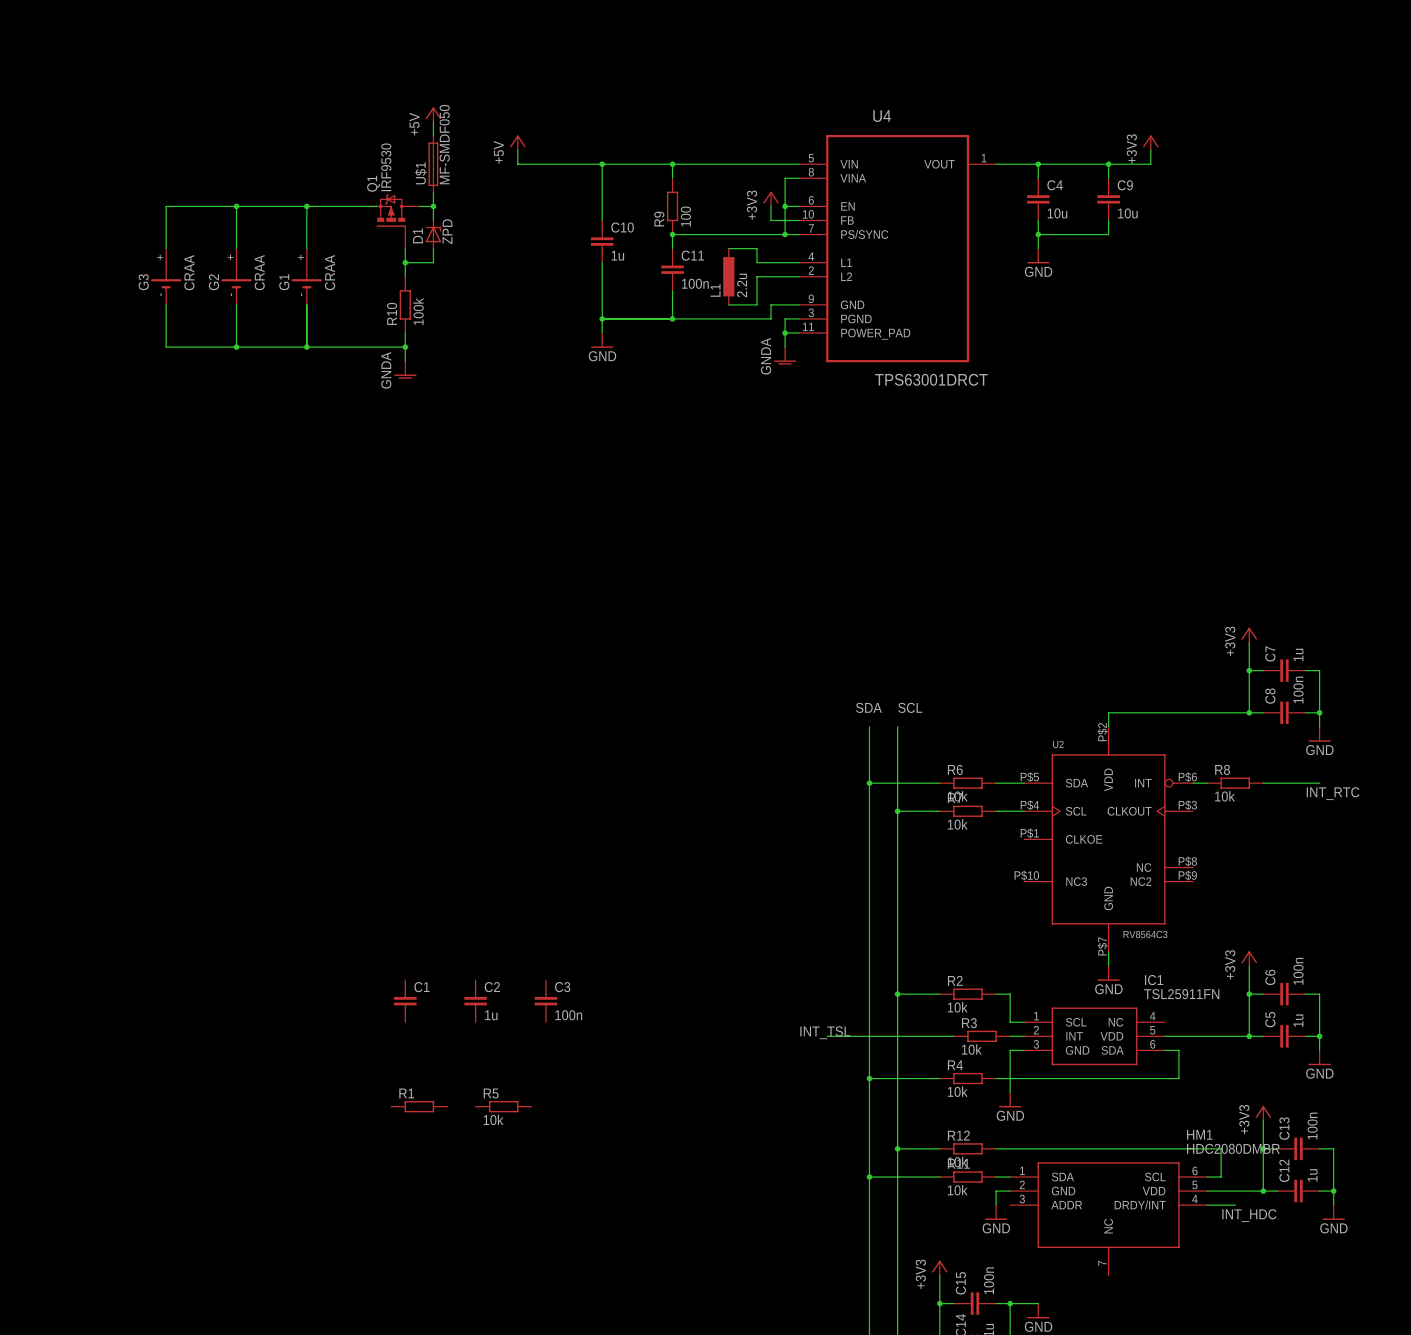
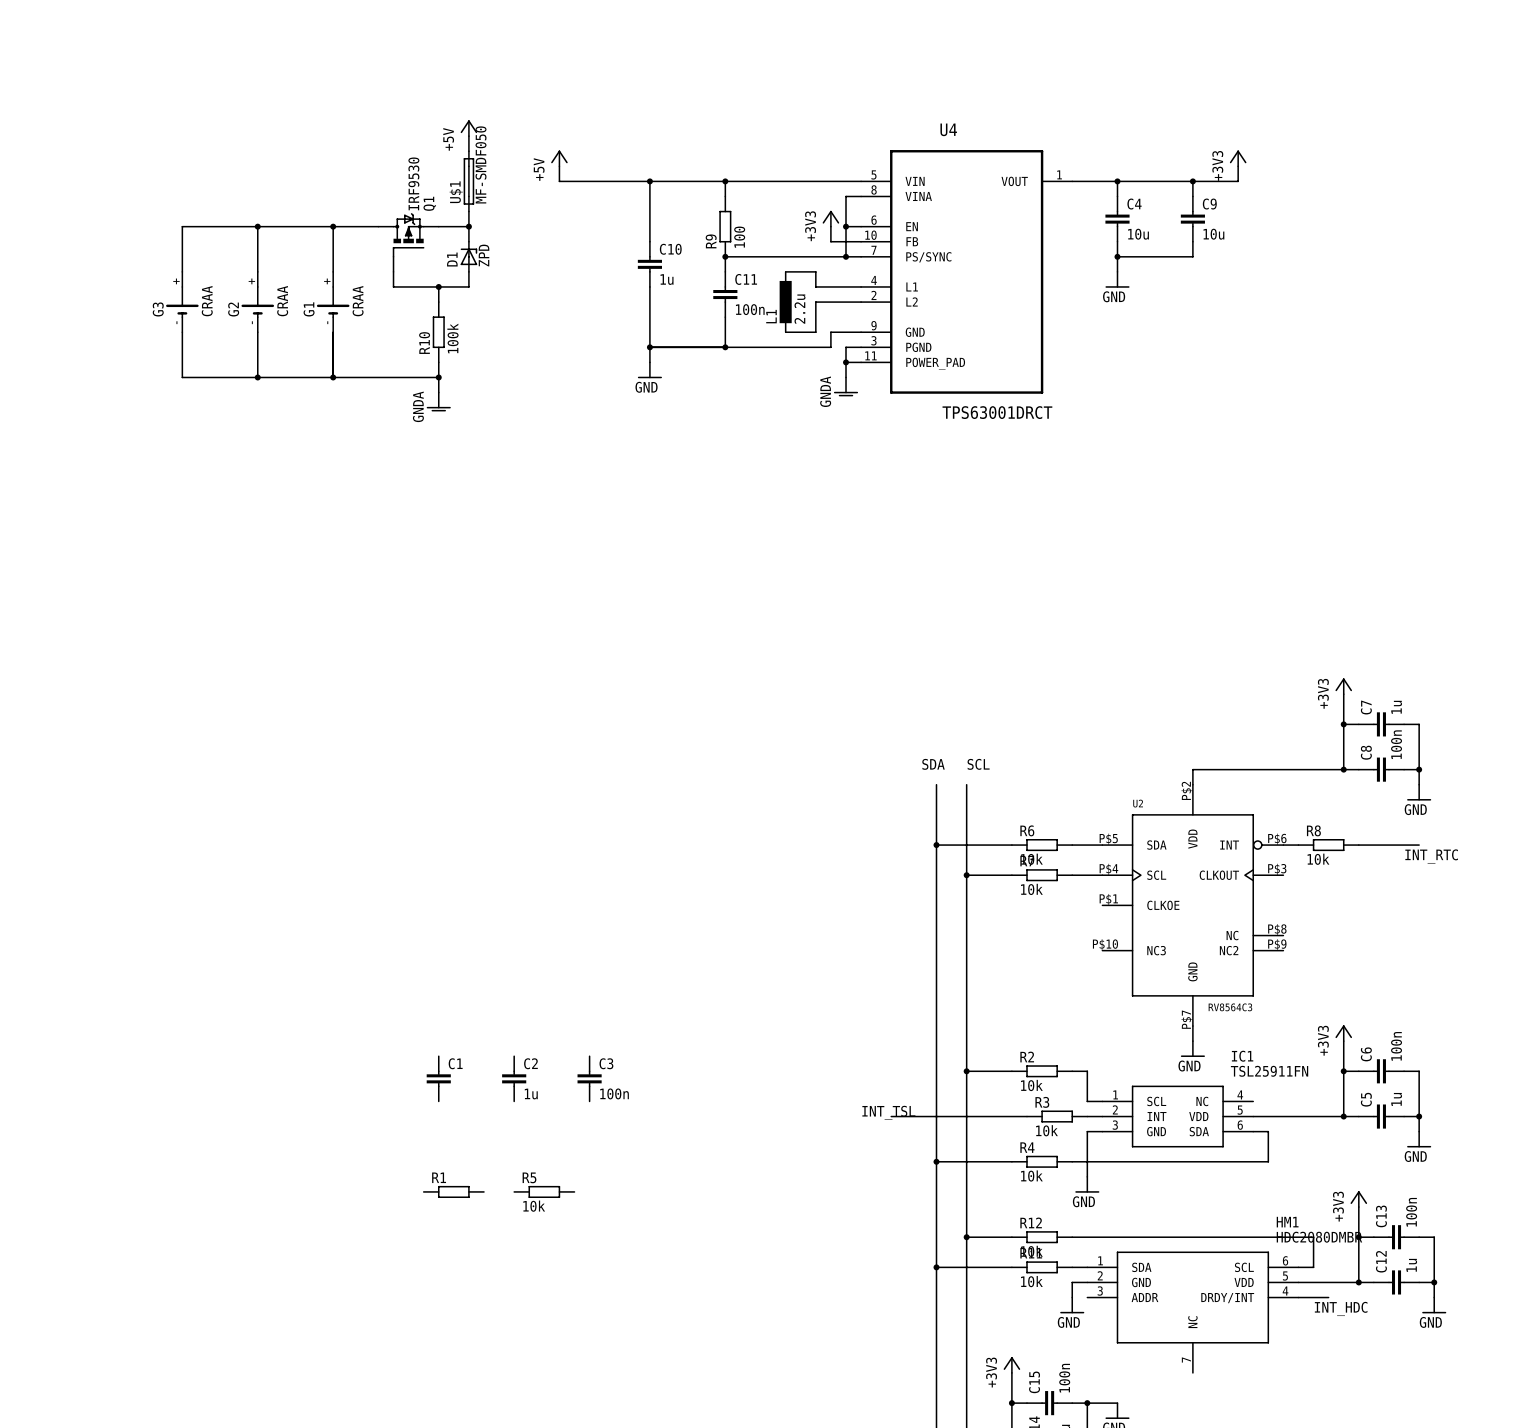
Q1 flip: as is (391, 214) -> left-right (408, 235)
wire: (405, 248) (405, 262) -> (393, 271) (393, 286) (438, 286)

